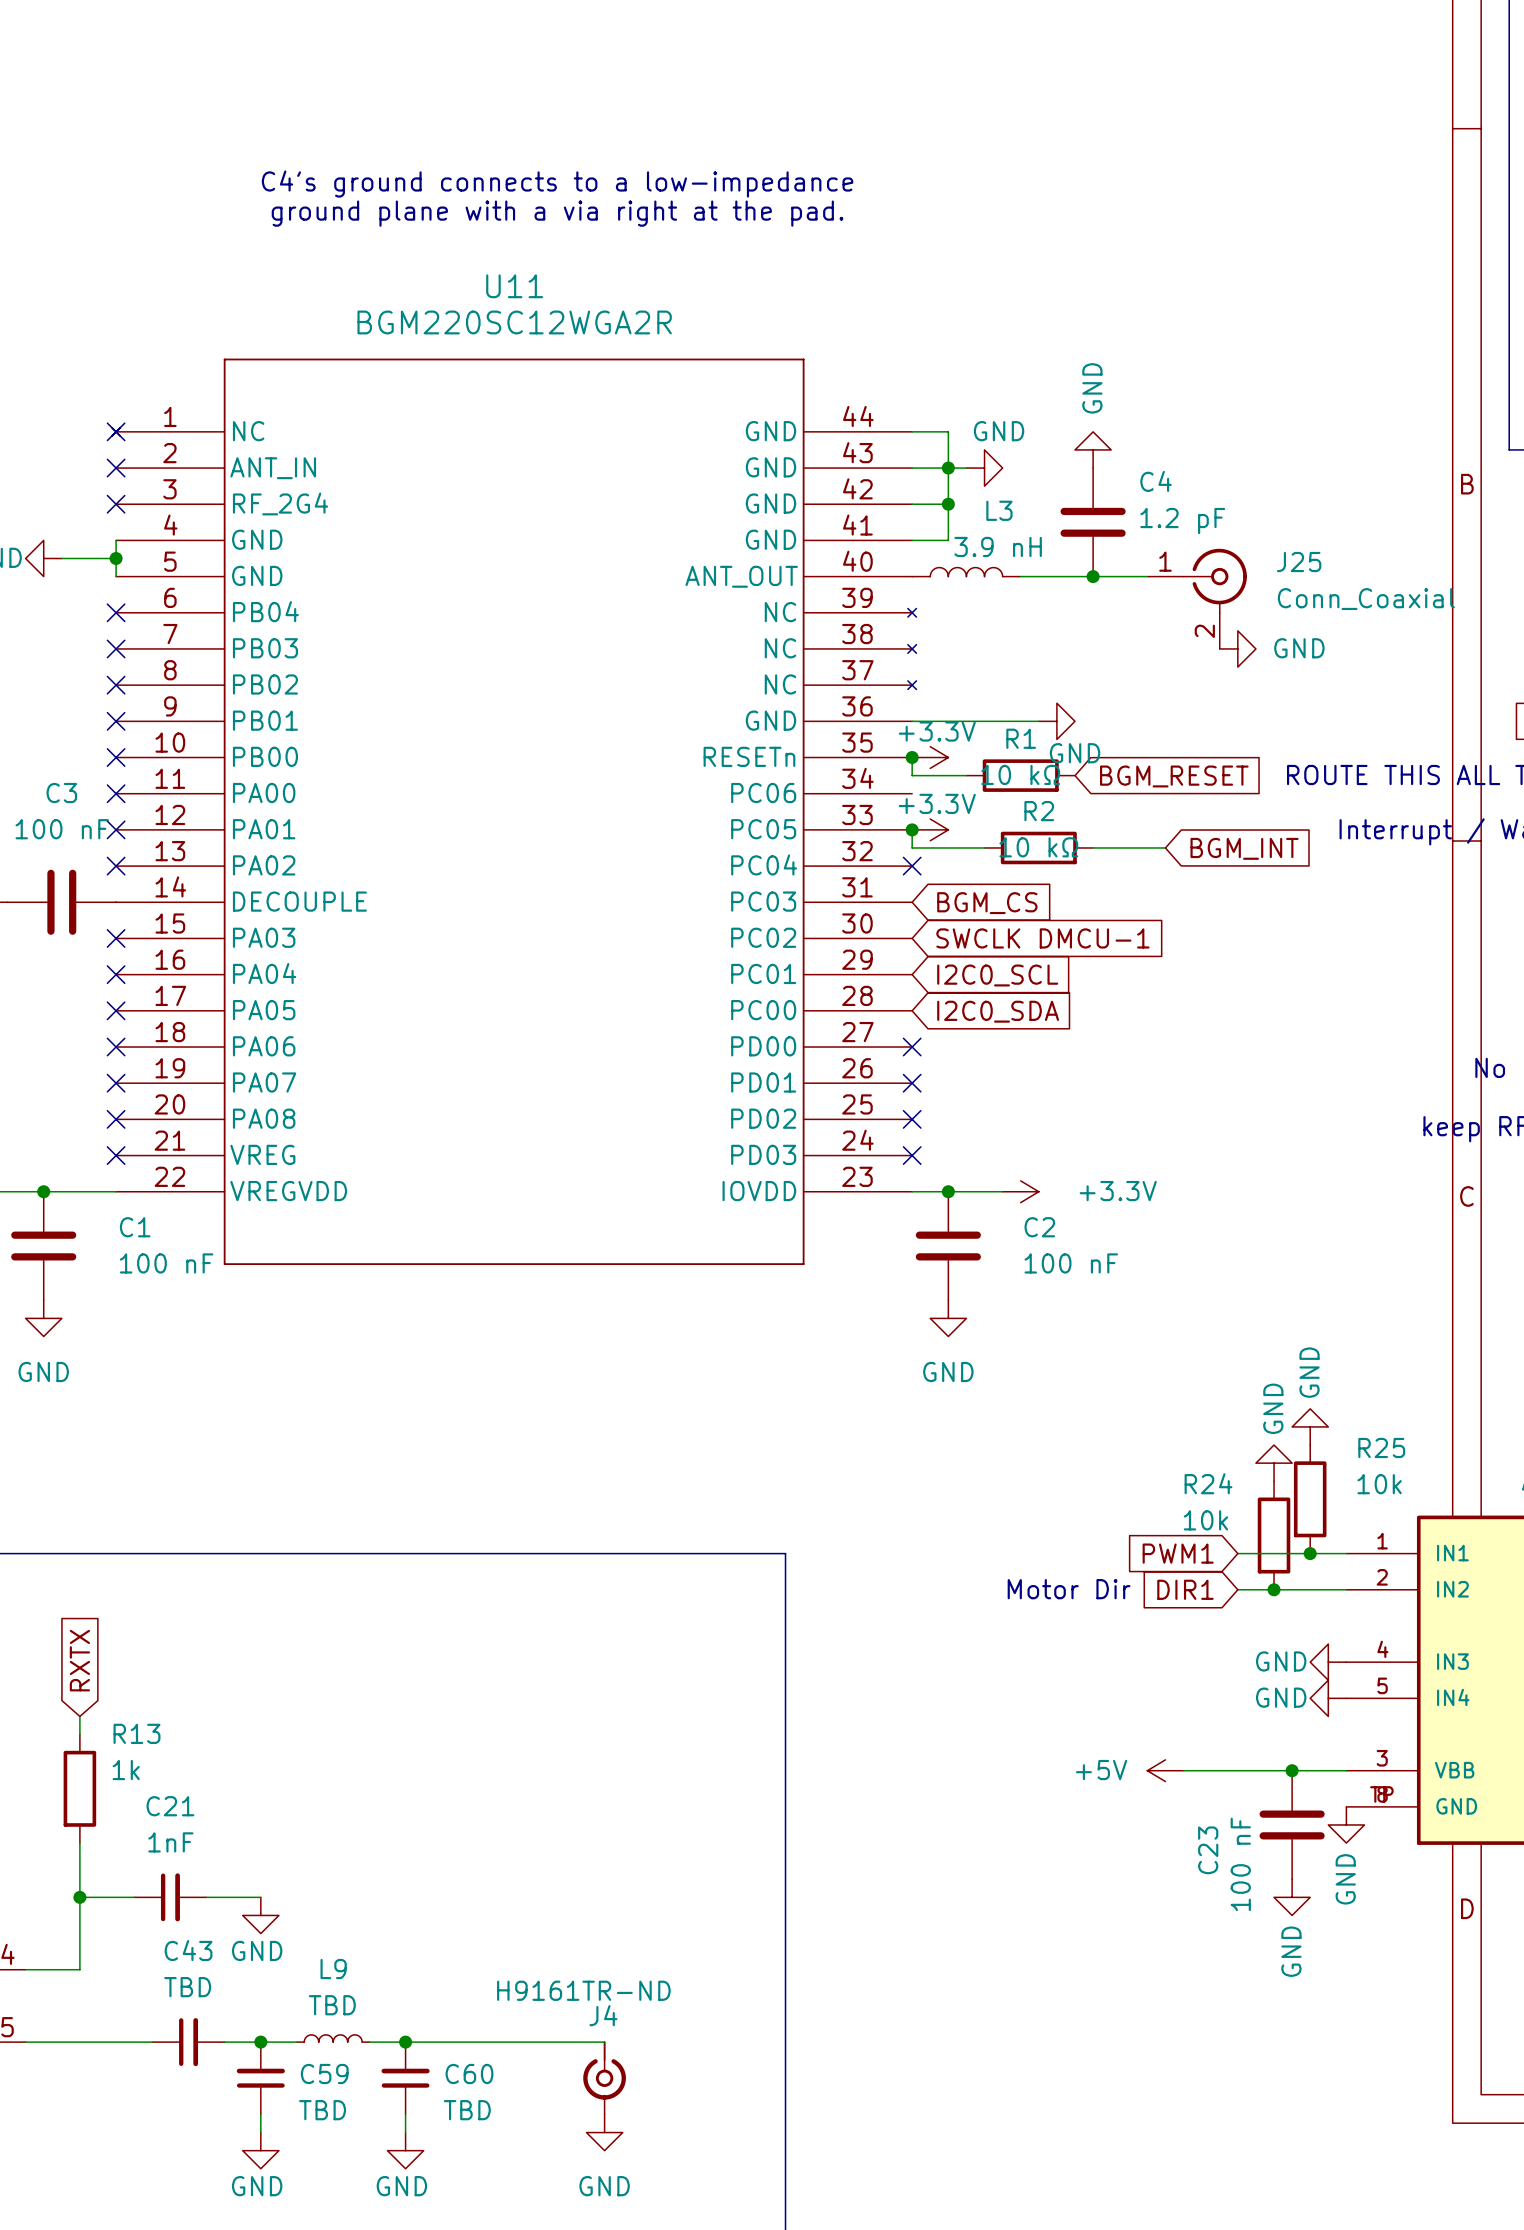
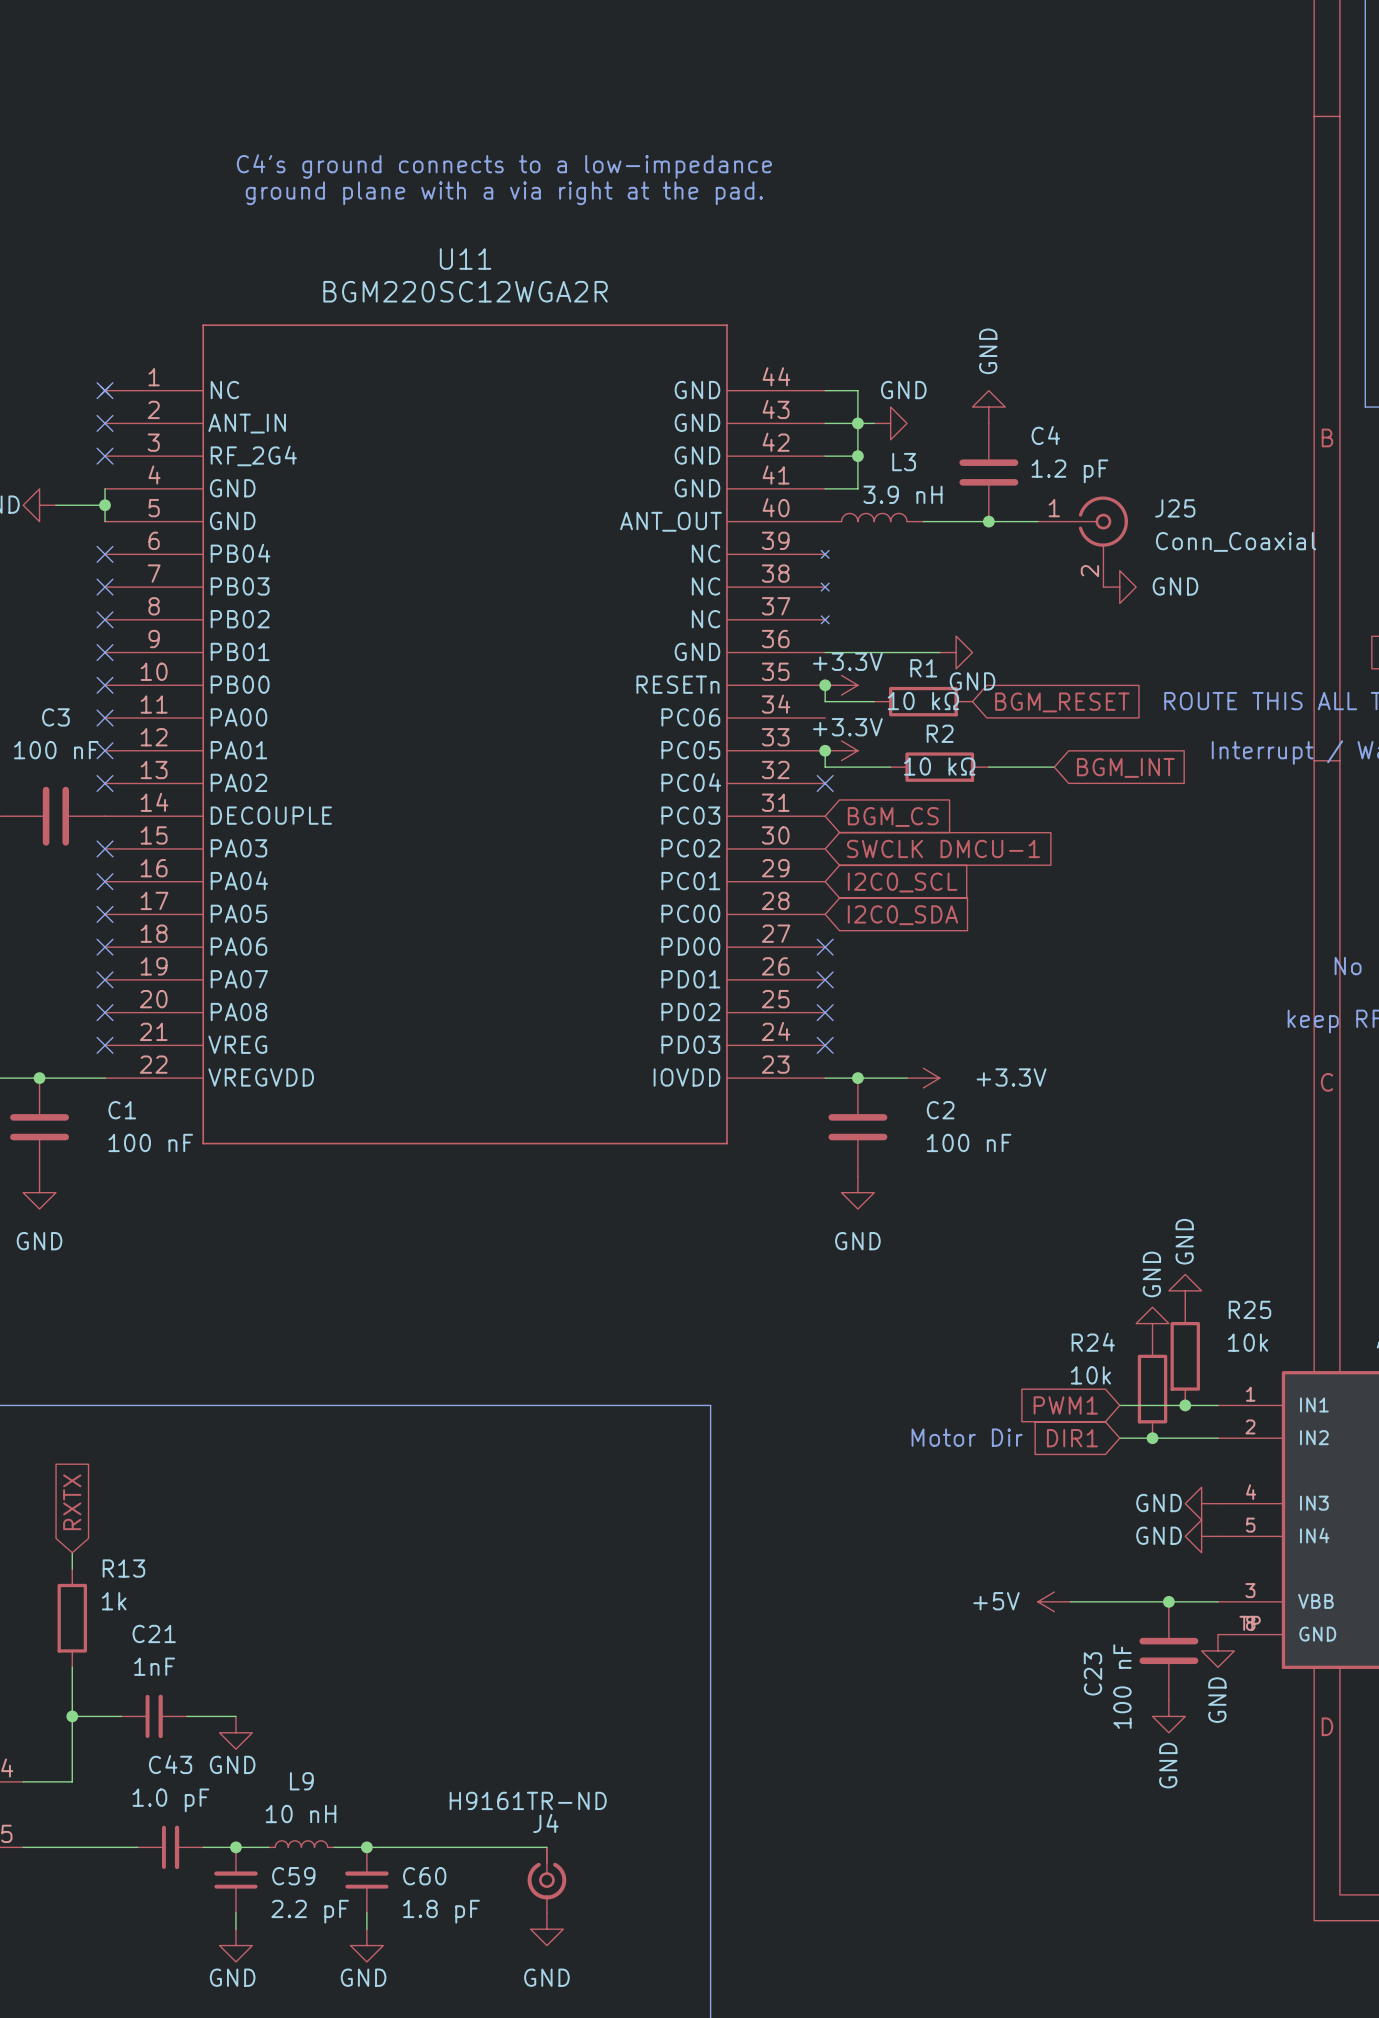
C43 value: TBD (187, 1987) -> 1.0 pF (170, 1800)
L9 value: TBD (332, 2005) -> 10 nH (301, 1814)
C59 value: TBD (322, 2110) -> 2.2 pF (310, 1911)
C60 value: TBD (467, 2110) -> 1.8 pF (441, 1911)

